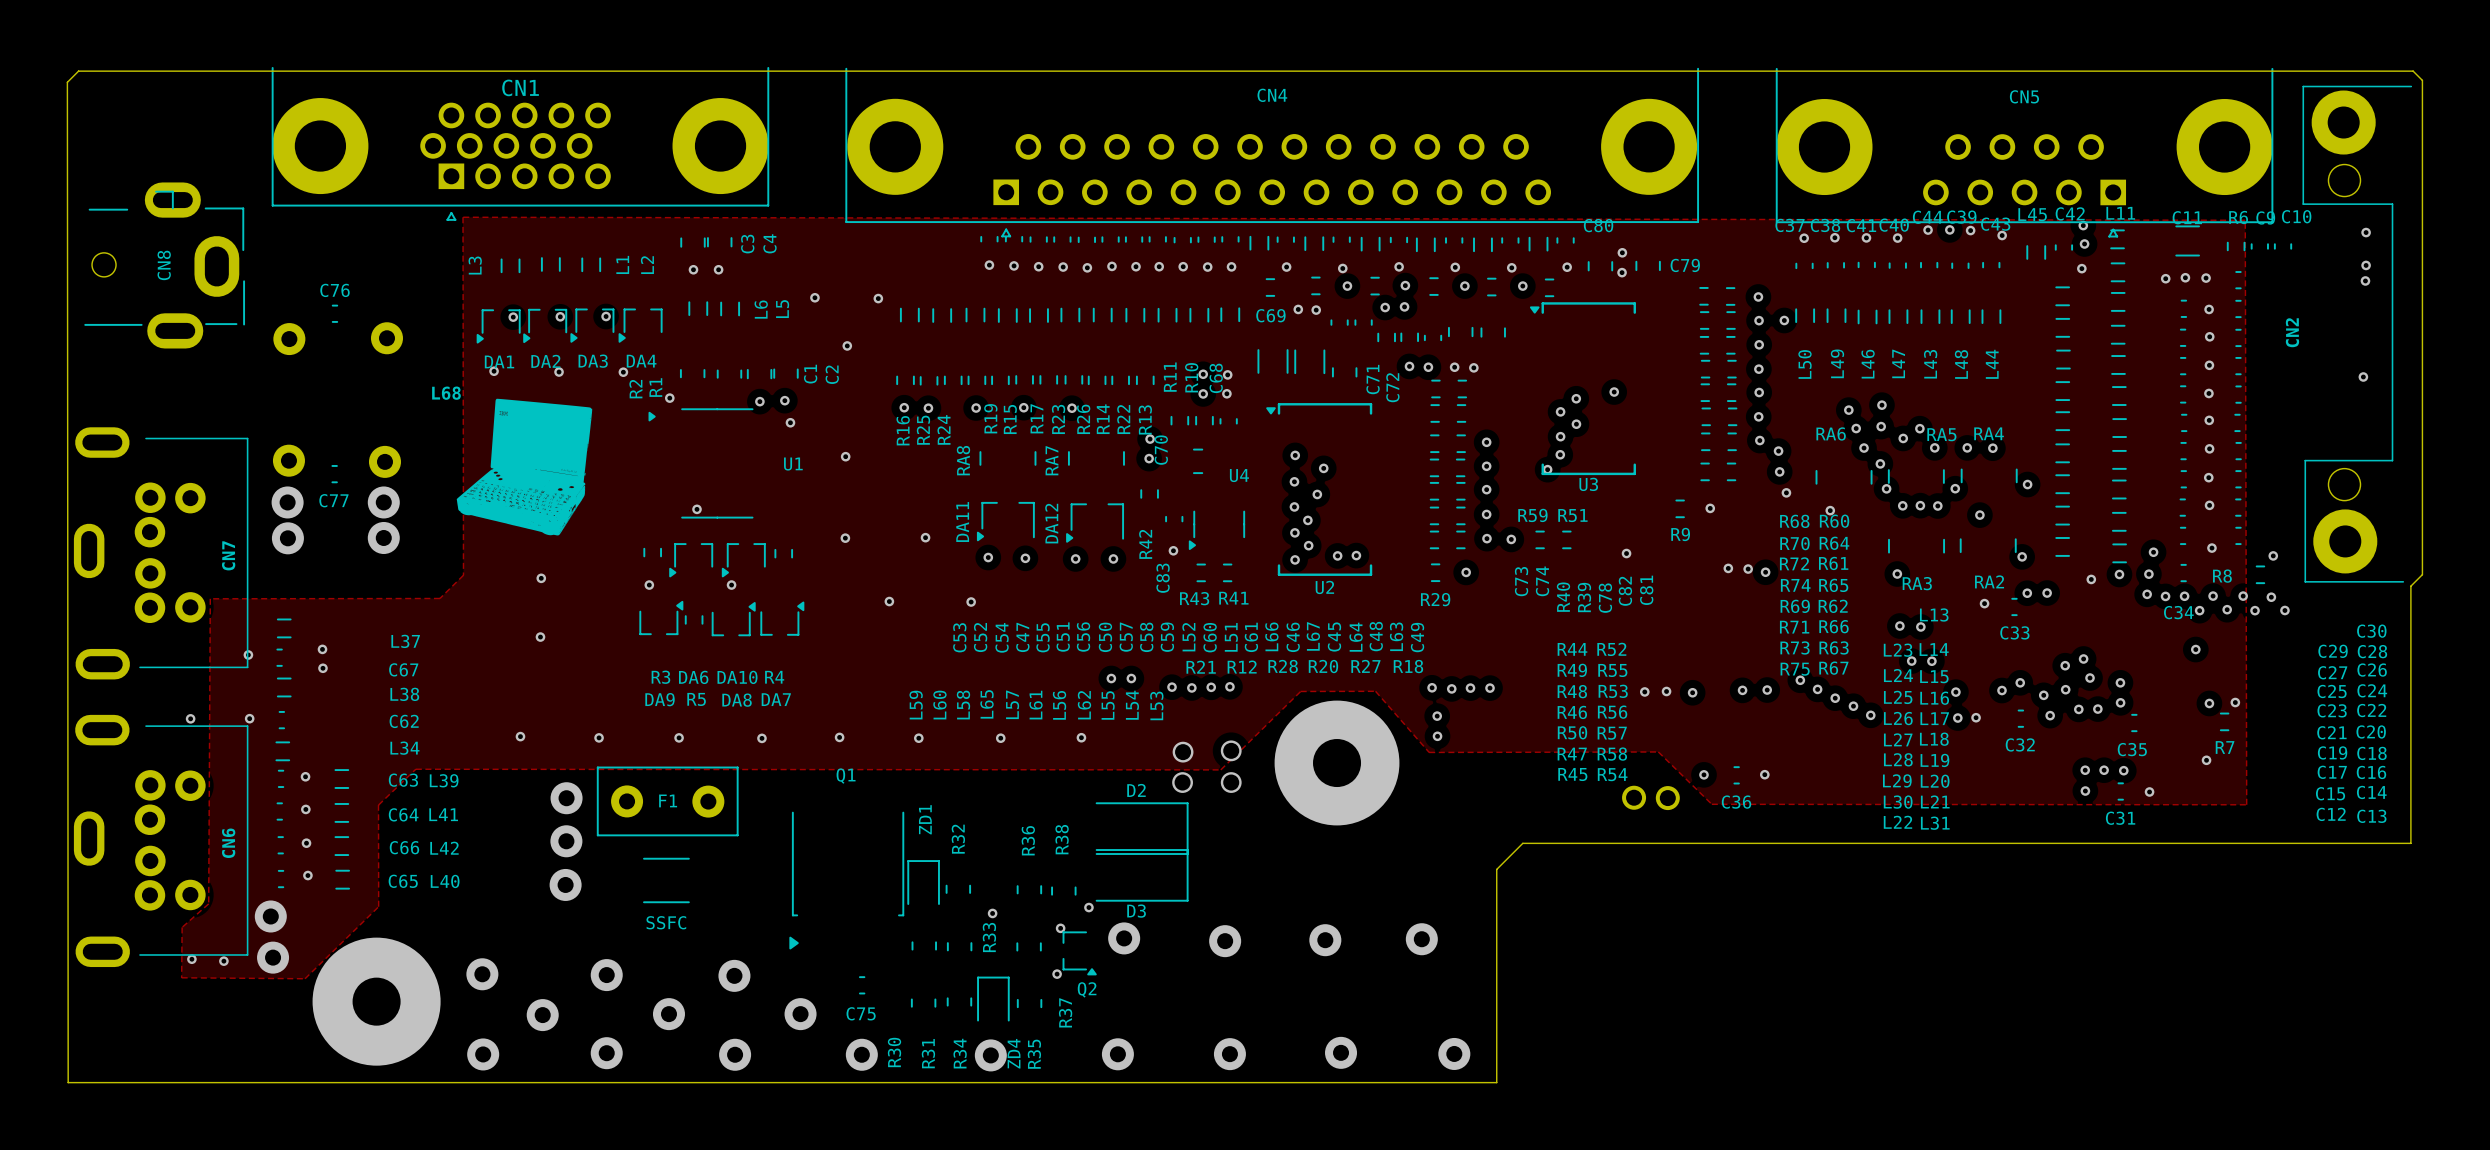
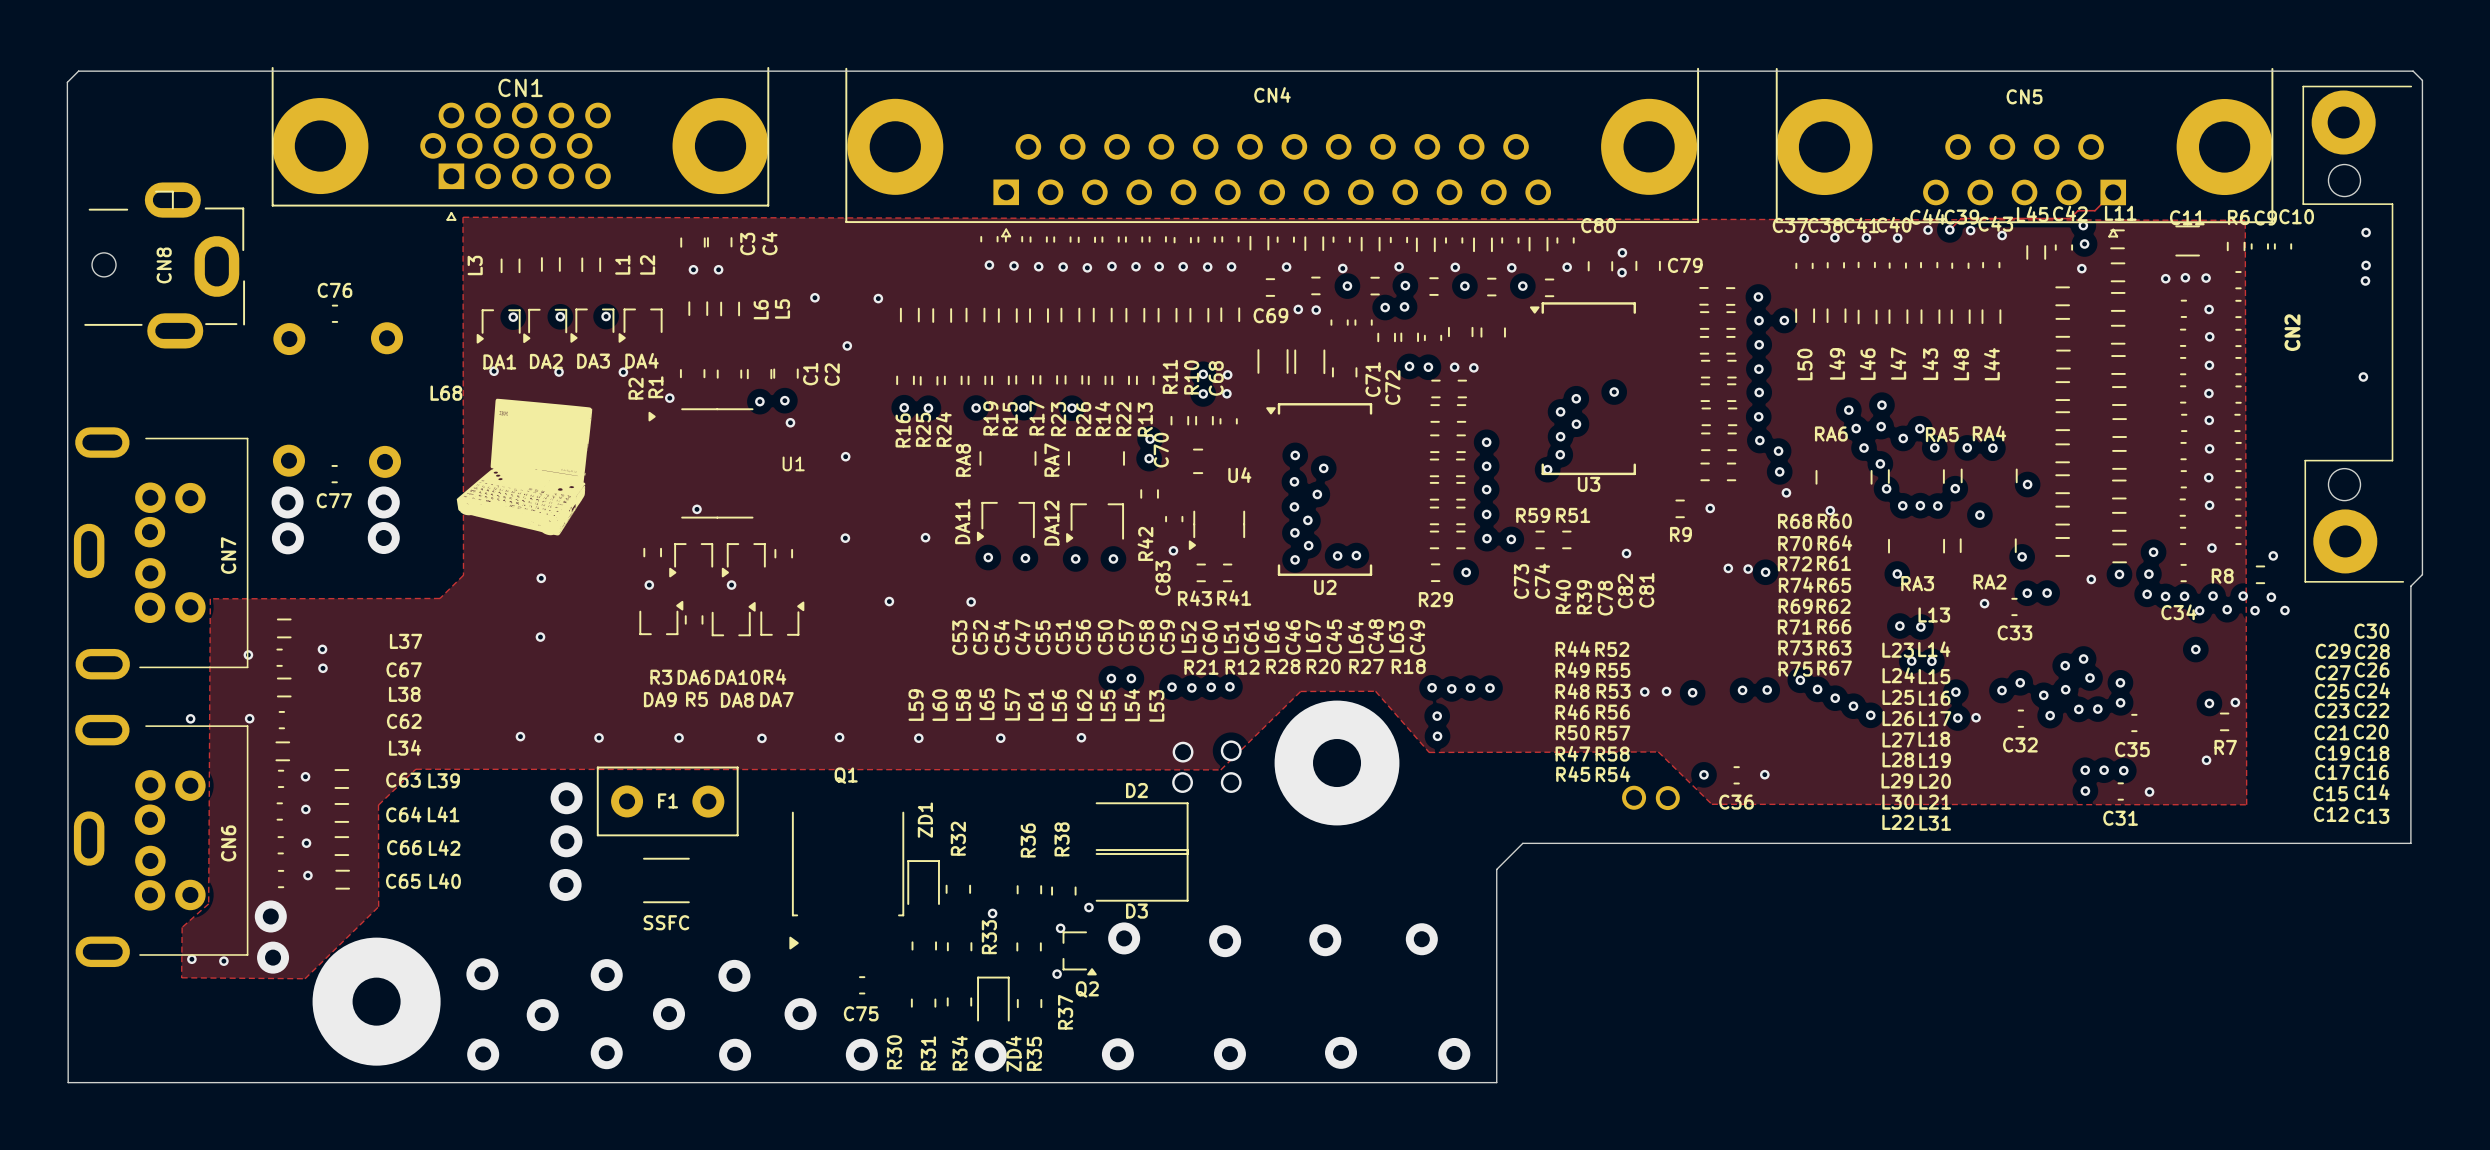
track: none -> (2113, 192) (2094, 210) (2078, 210) (2070, 218) (1961, 218) (1949, 229)

